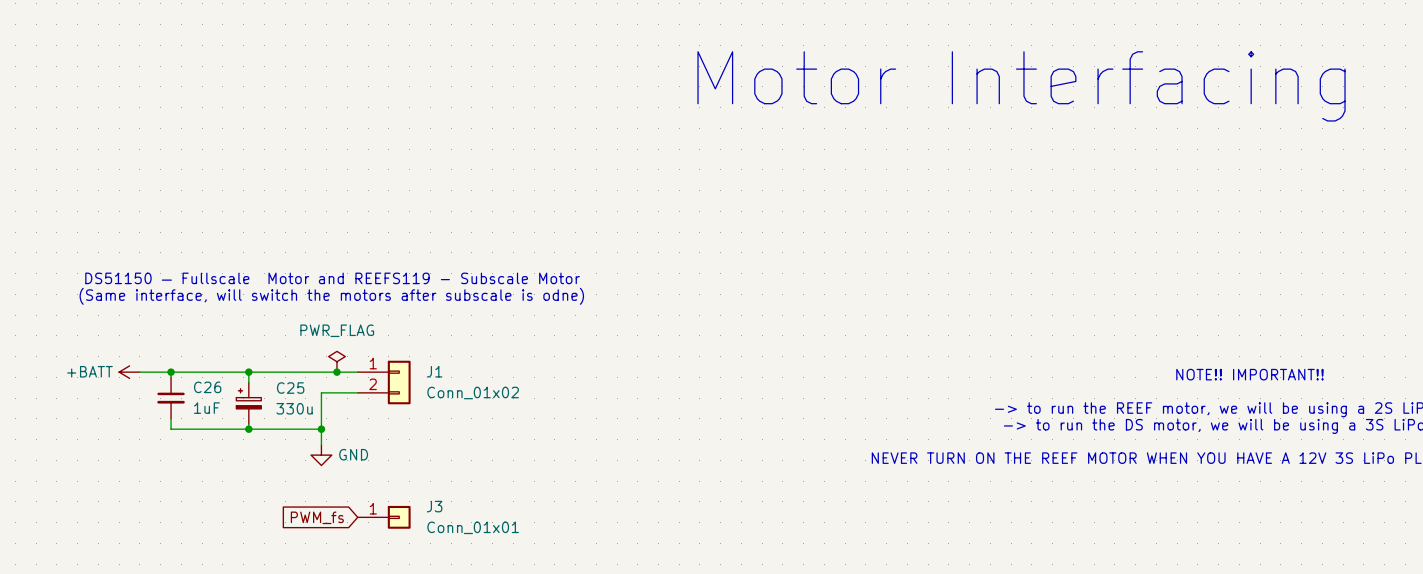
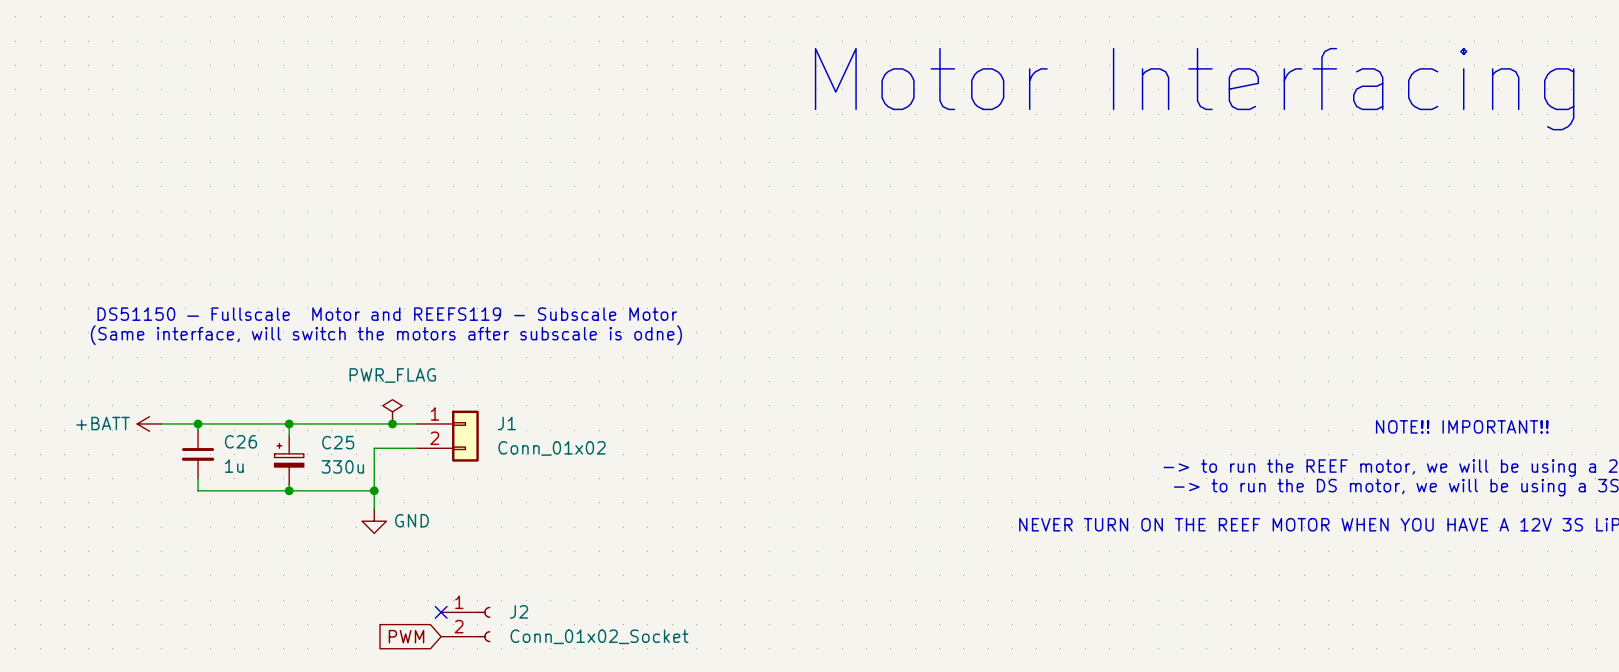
C26 value: 1uF (206, 408) -> 1u (234, 466)
global label: PWM_fs (317, 517) -> none
J3: Conn_01x01 (384, 517) -> none
no-connect mark: none -> (441, 612)
J2: none -> Conn_01x02_Socket (465, 624)
global label: none -> PWM (406, 636)

